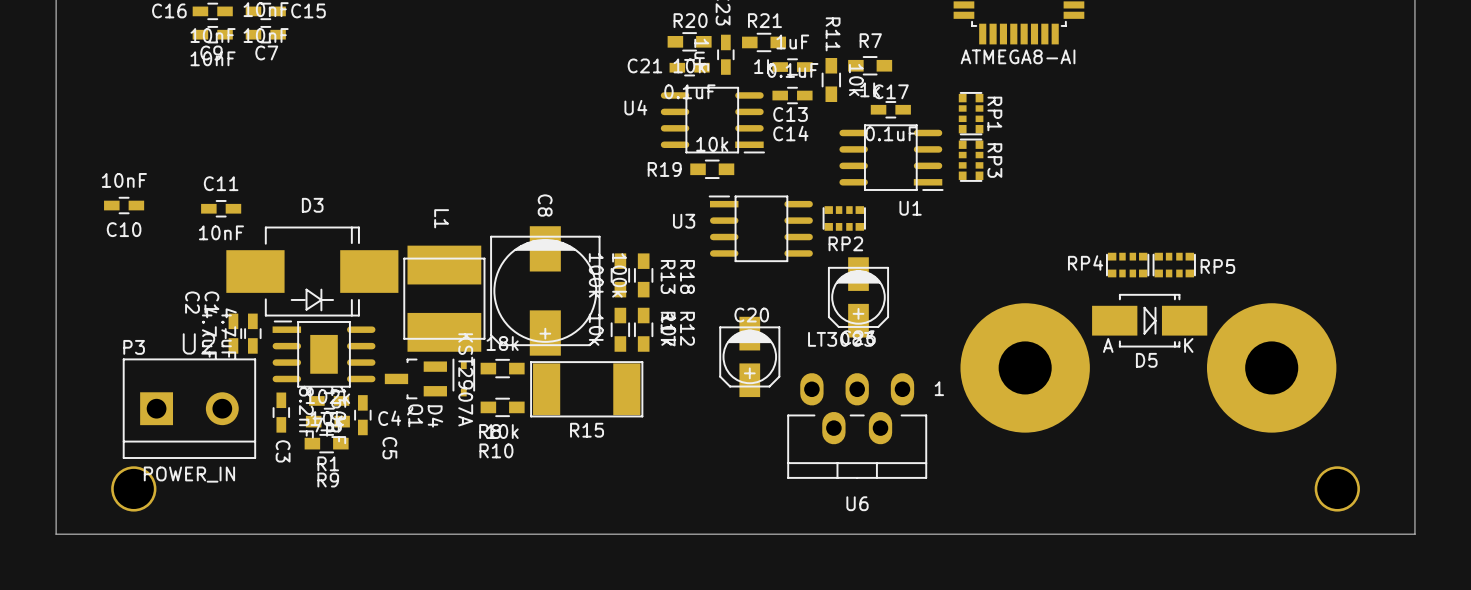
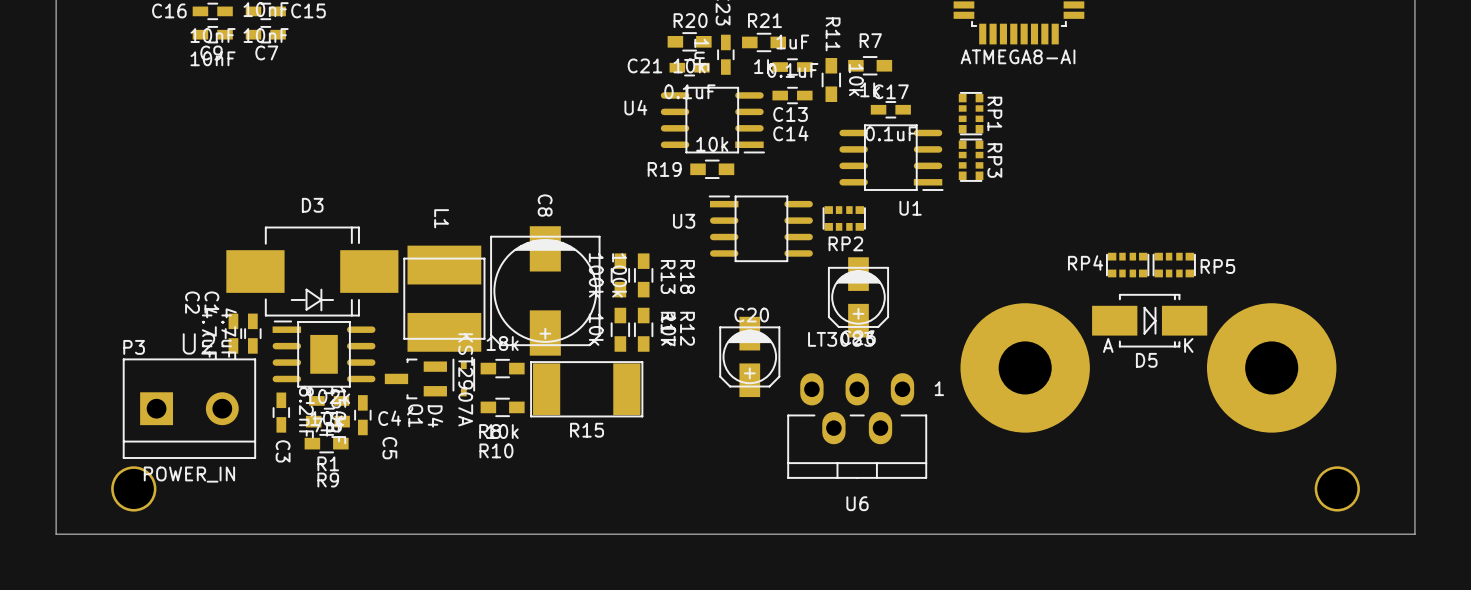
C10: 10nF (124, 205) -> none
C11: 10nF (221, 208) -> none

